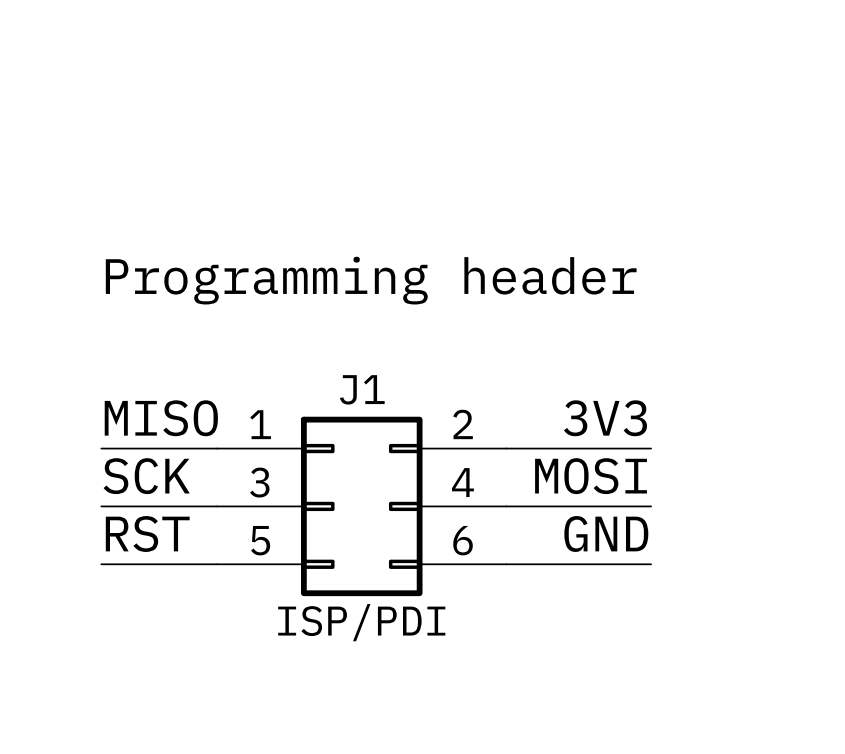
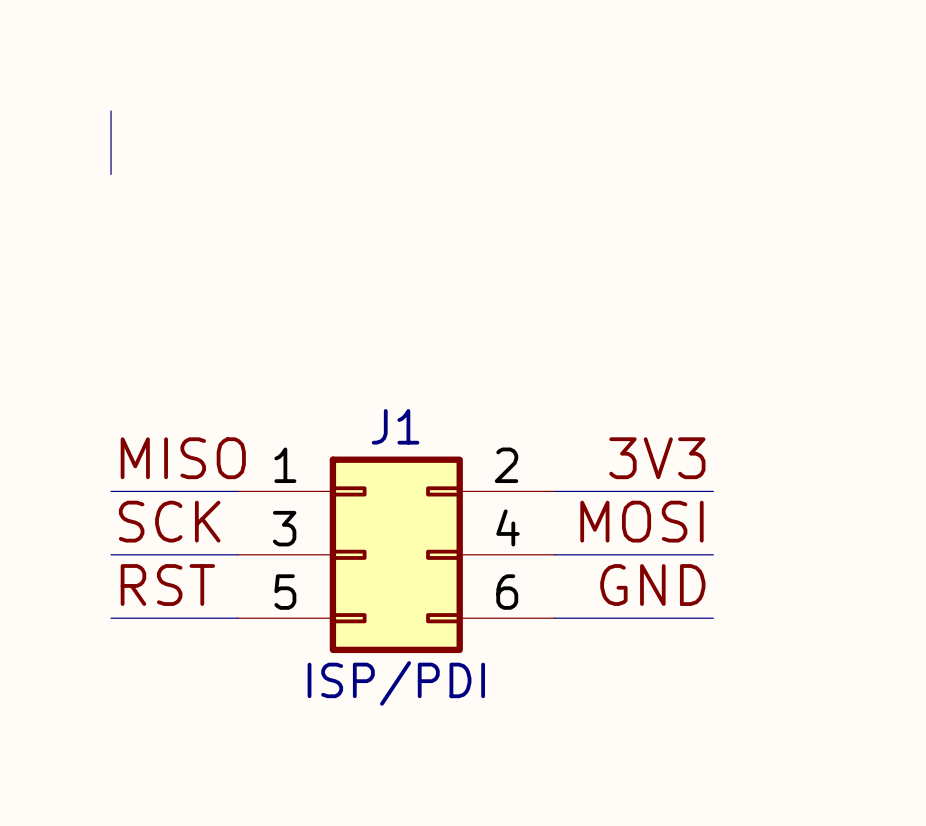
wire: none -> (111, 111) (111, 174)
text: Programming header (371, 280) -> none

